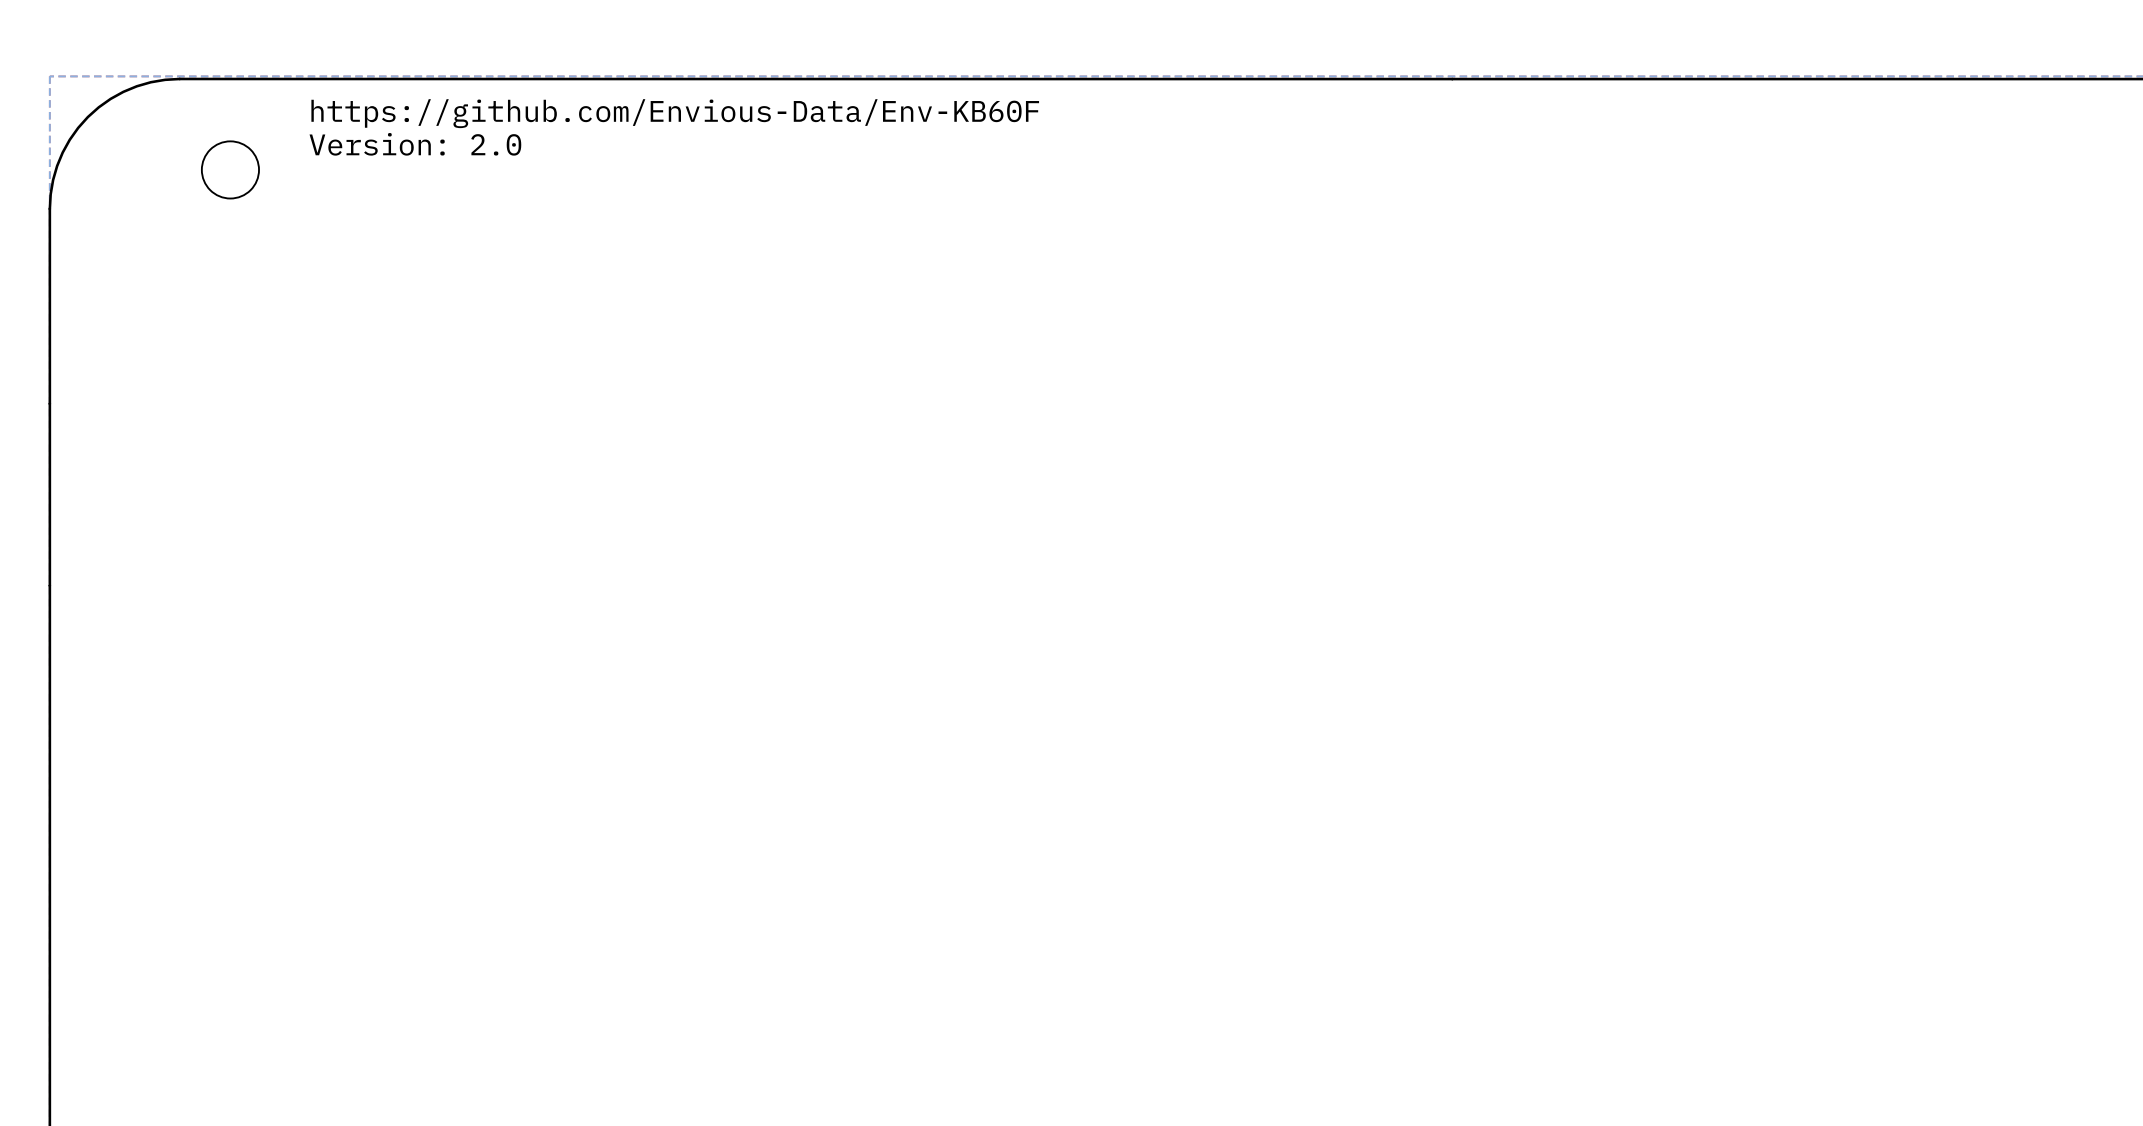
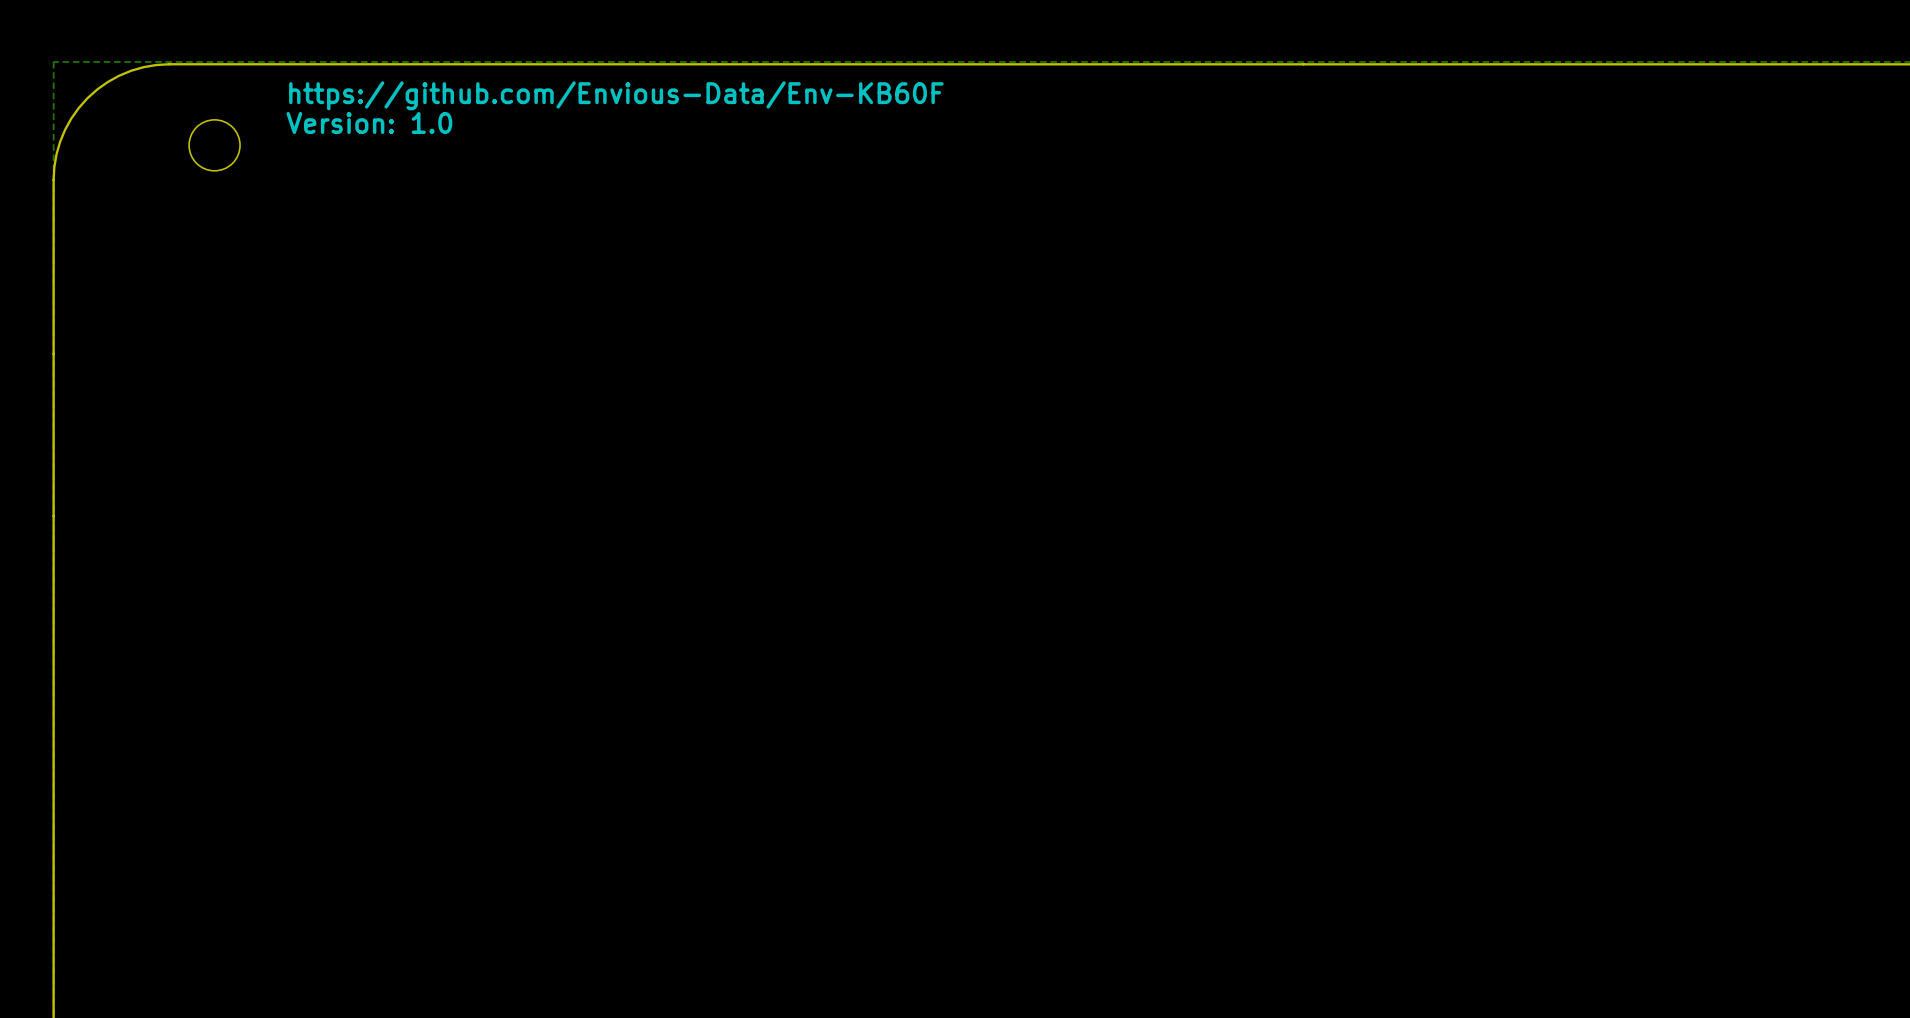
text: Version: 2.0 (415, 144) -> Version: 1.0 (369, 122)

